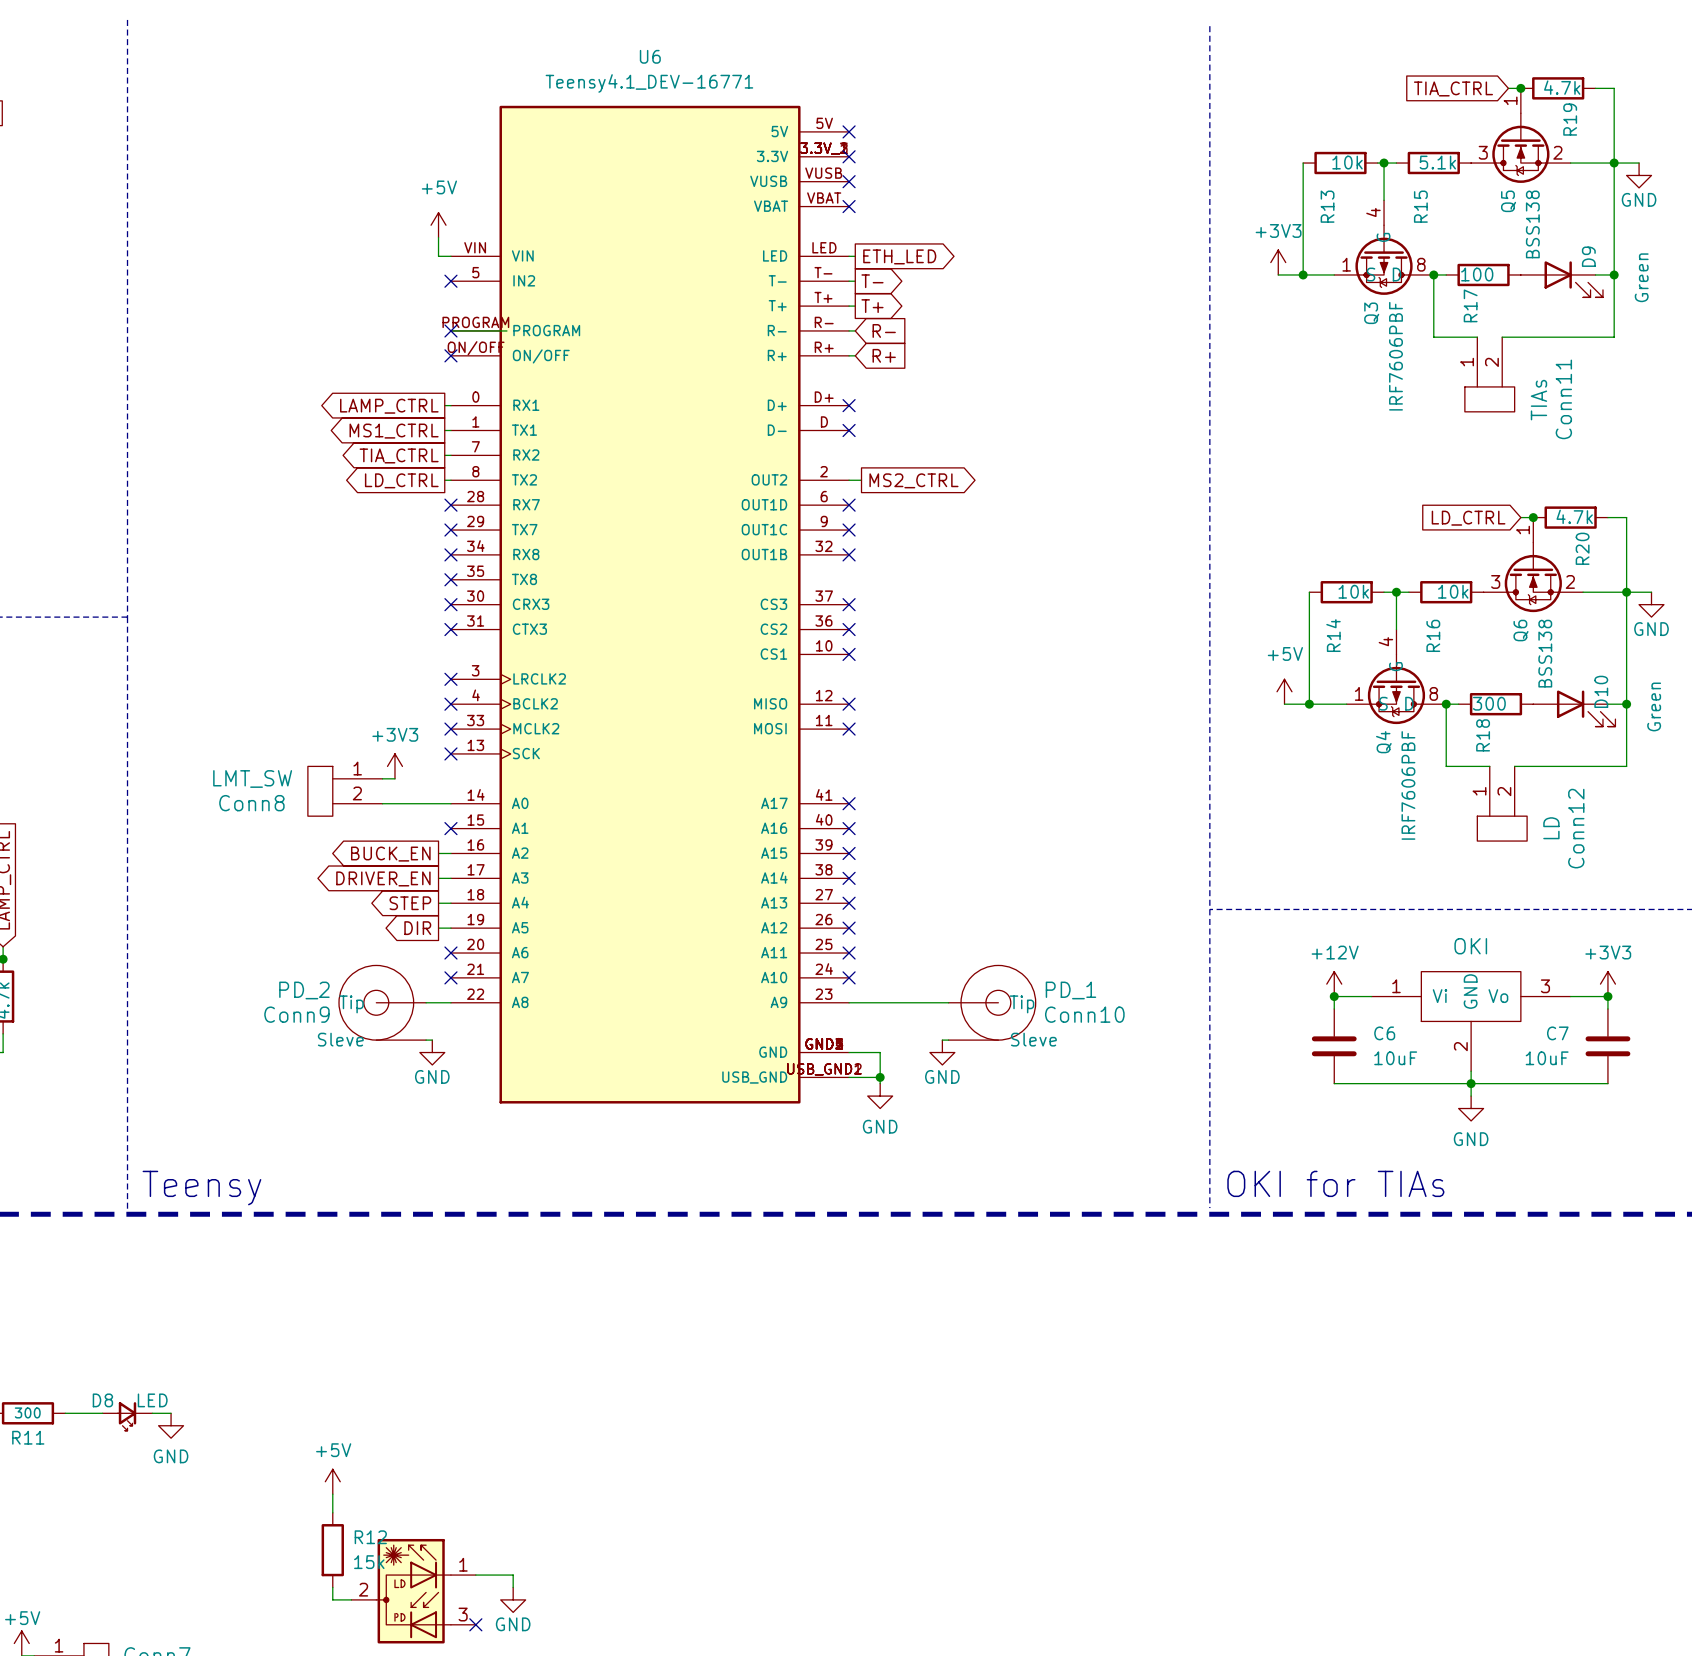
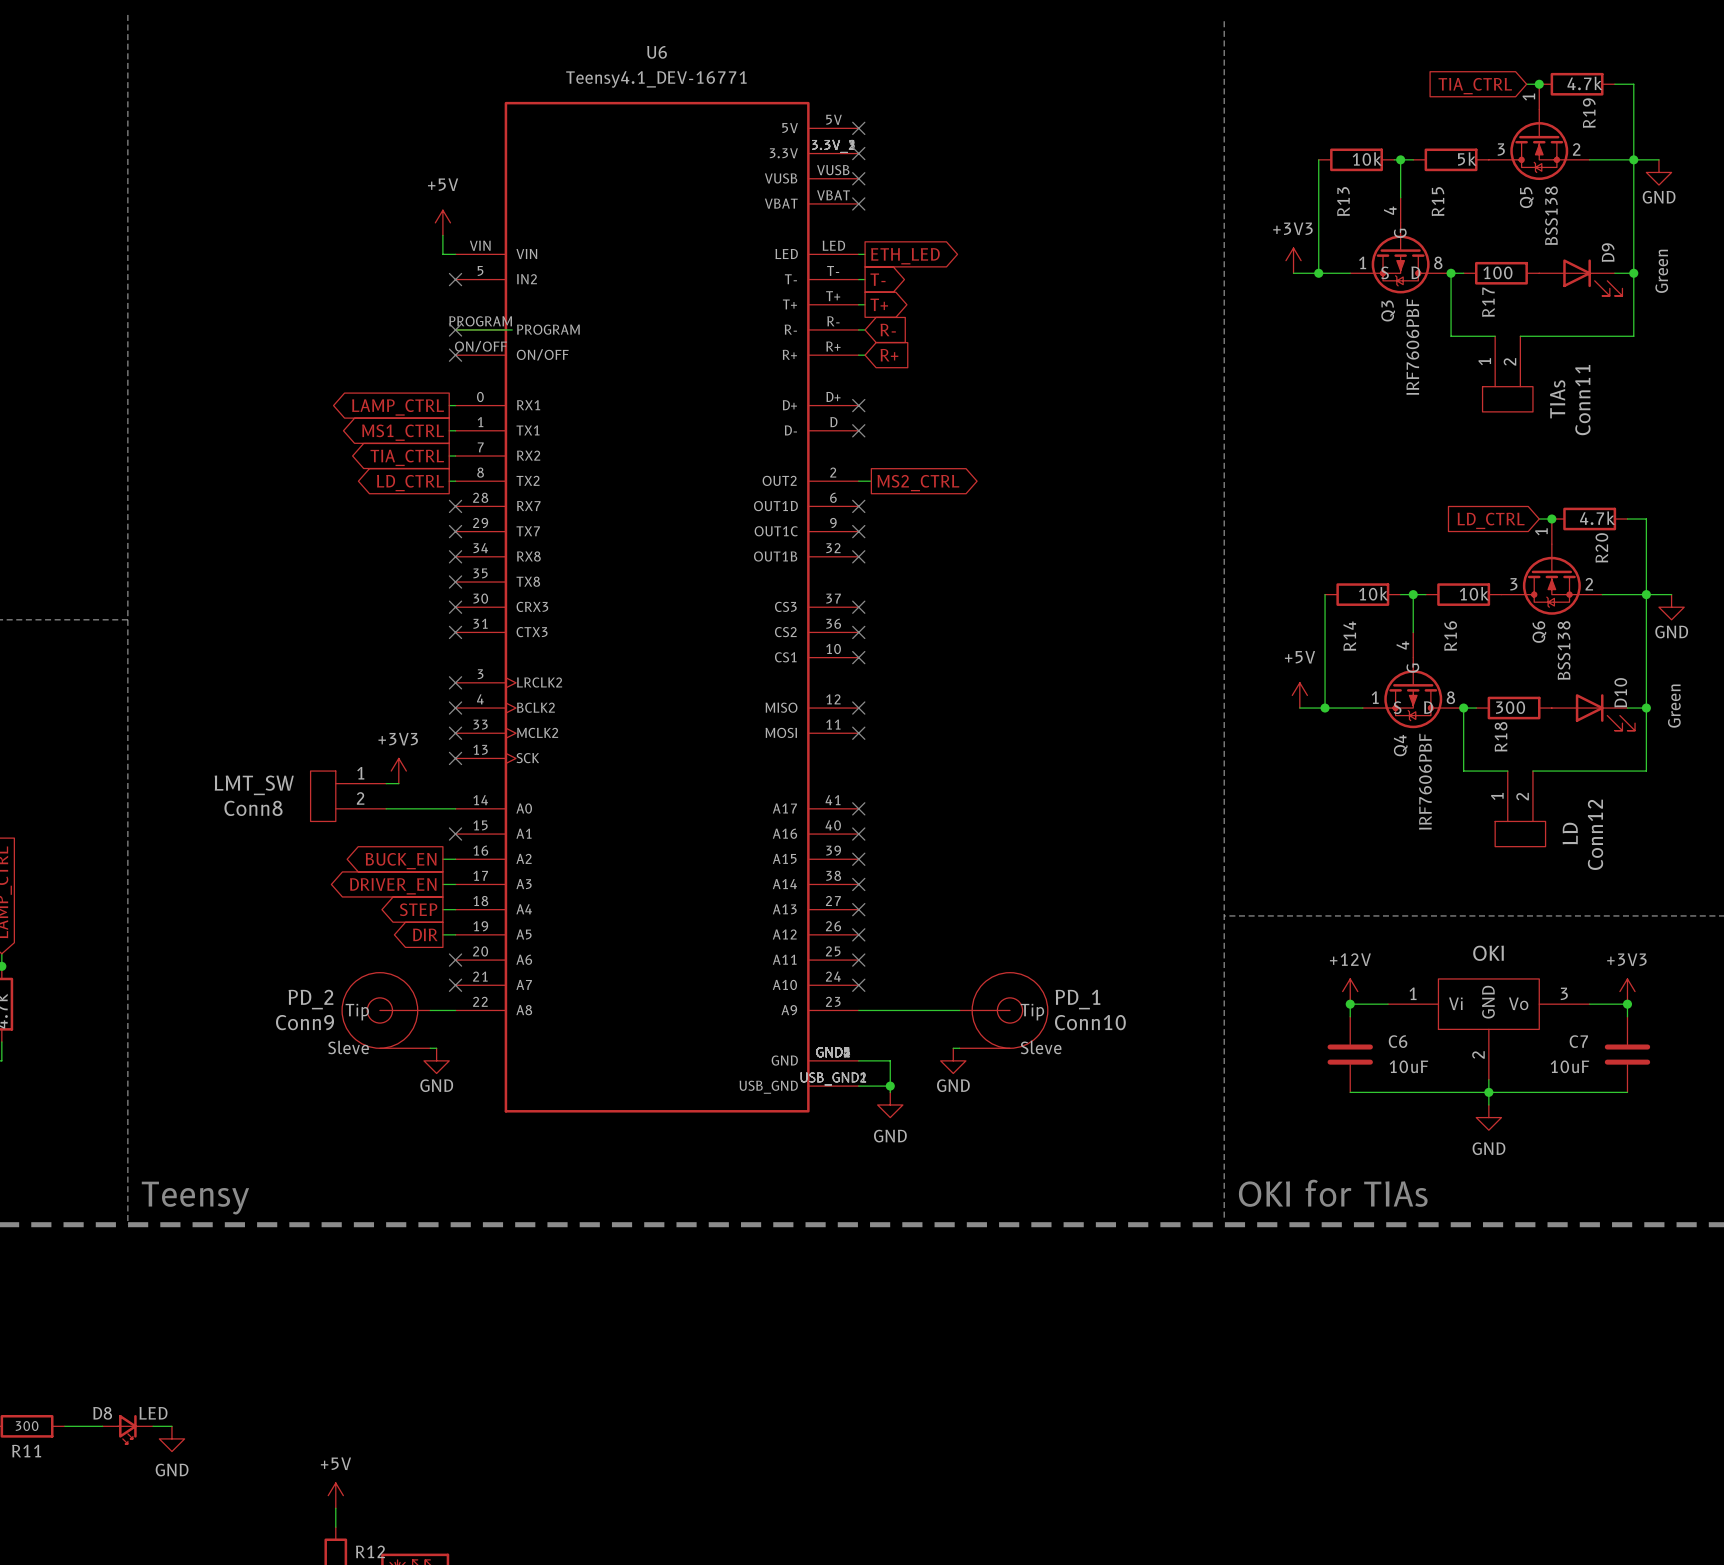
R15 value: 5.1k (1437, 162) -> 5k (1467, 158)

